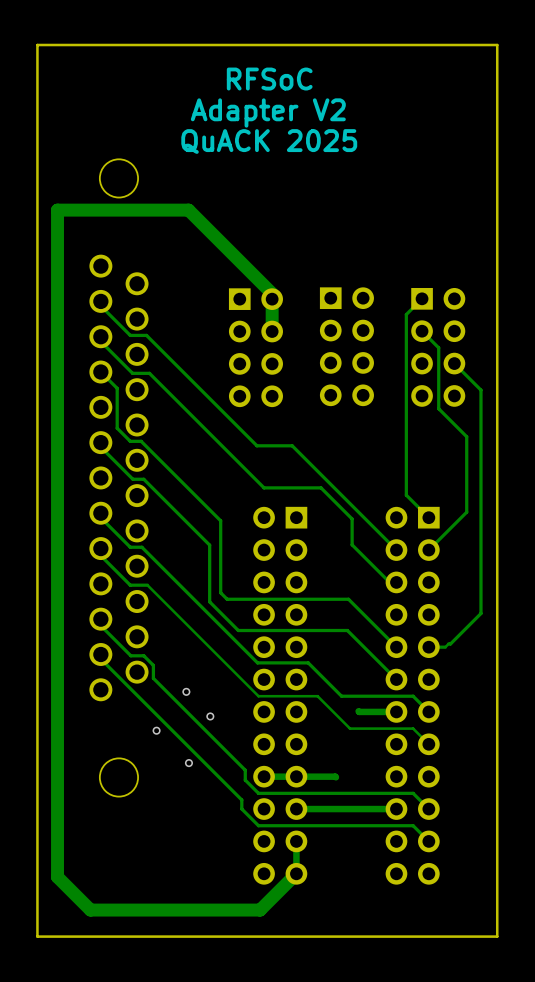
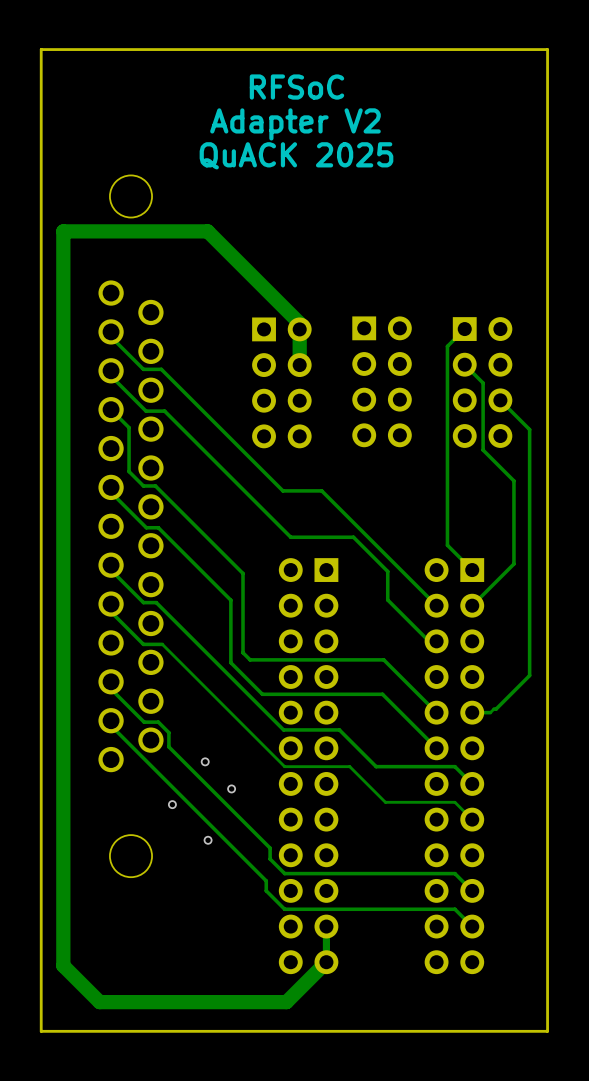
track: (358, 711) (396, 711) -> none
track: (264, 776) (335, 777) -> none
track: (396, 809) (296, 809) -> none

